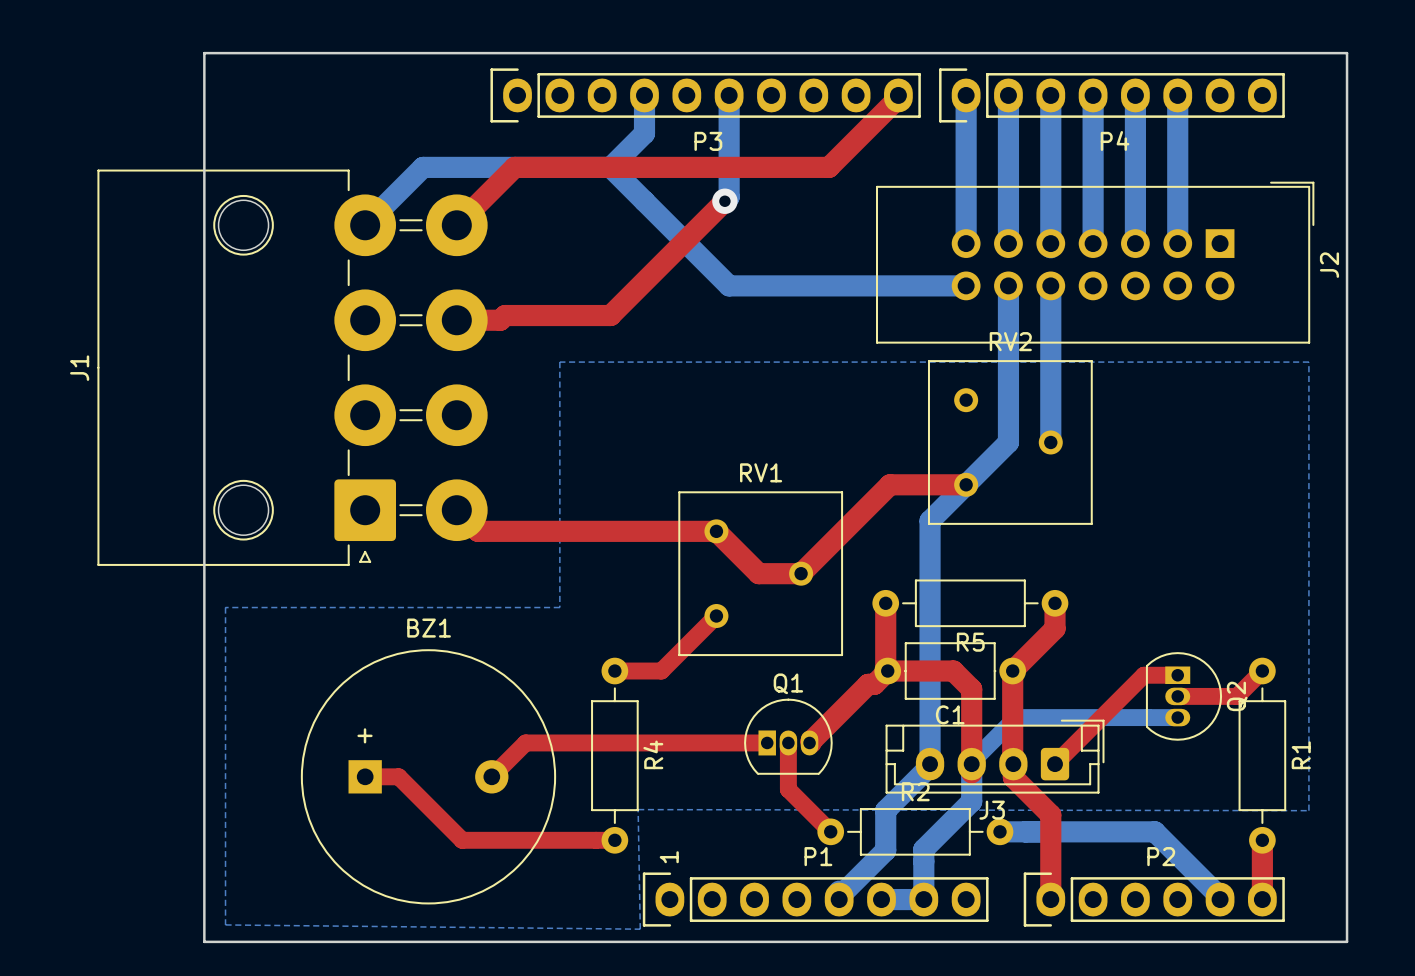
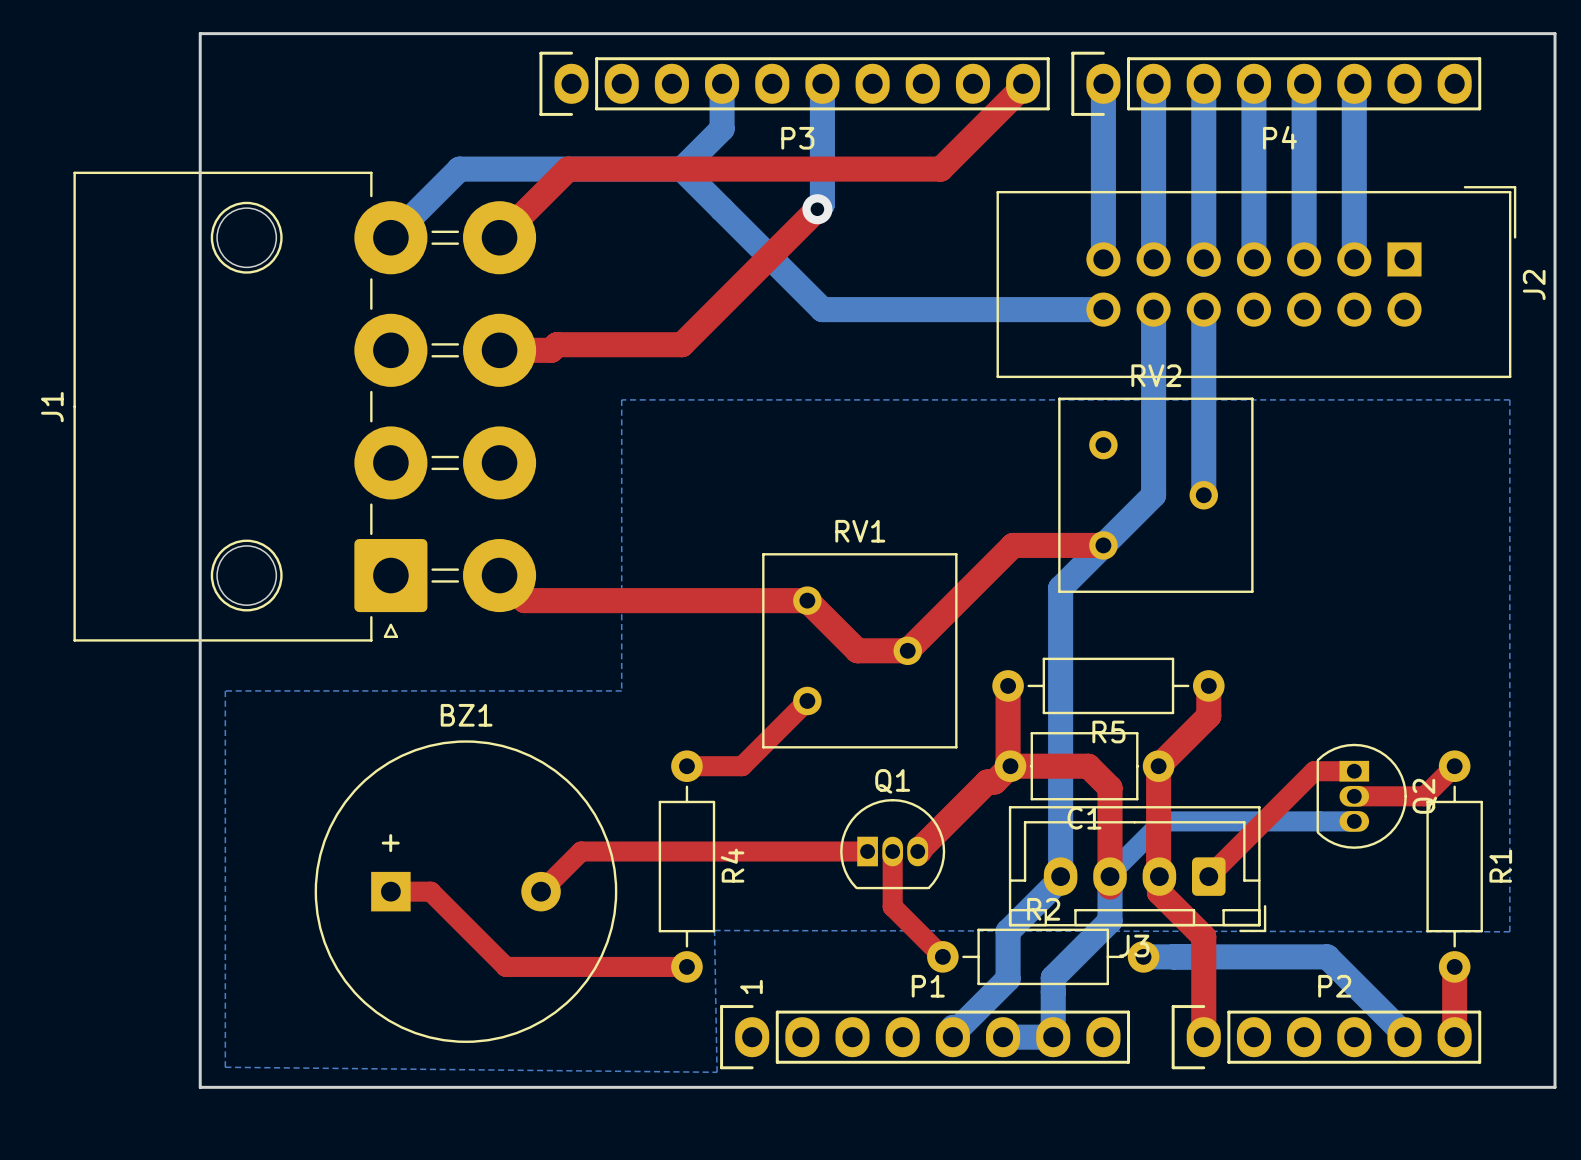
J3 footprint: [885, 719, 1105, 794] -> [1008, 806, 1267, 933]

